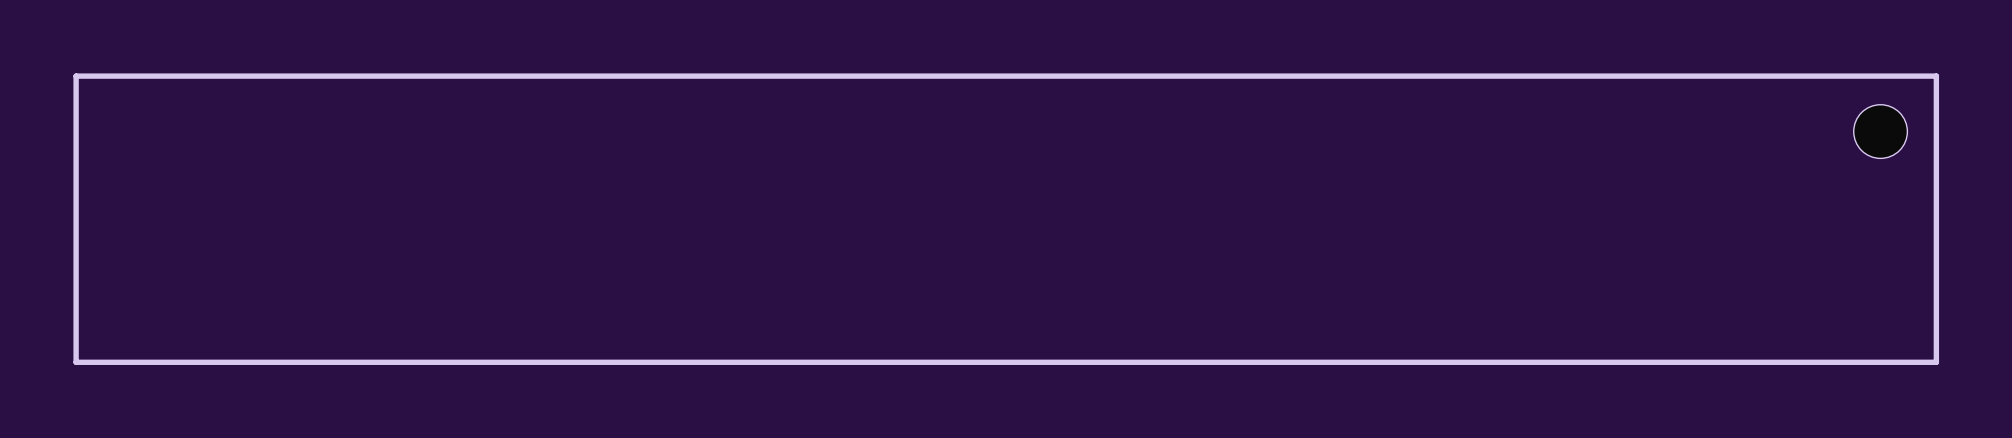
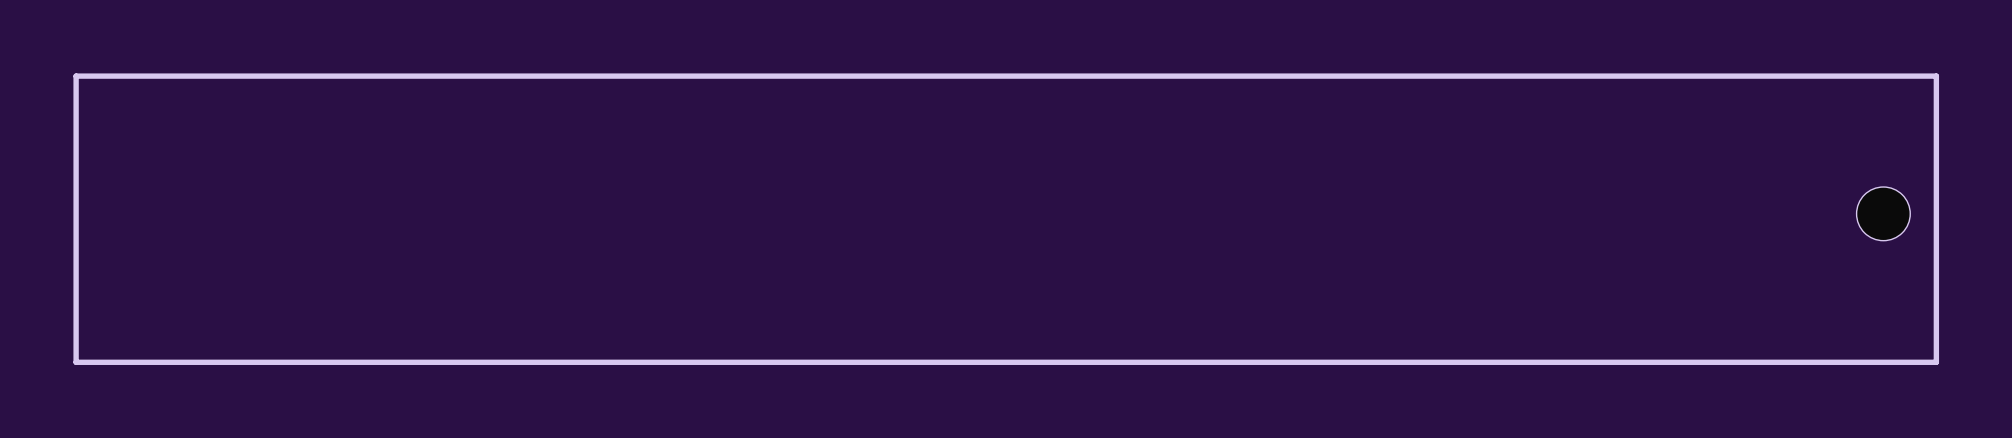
part position: (1880, 131) -> (1883, 213)

